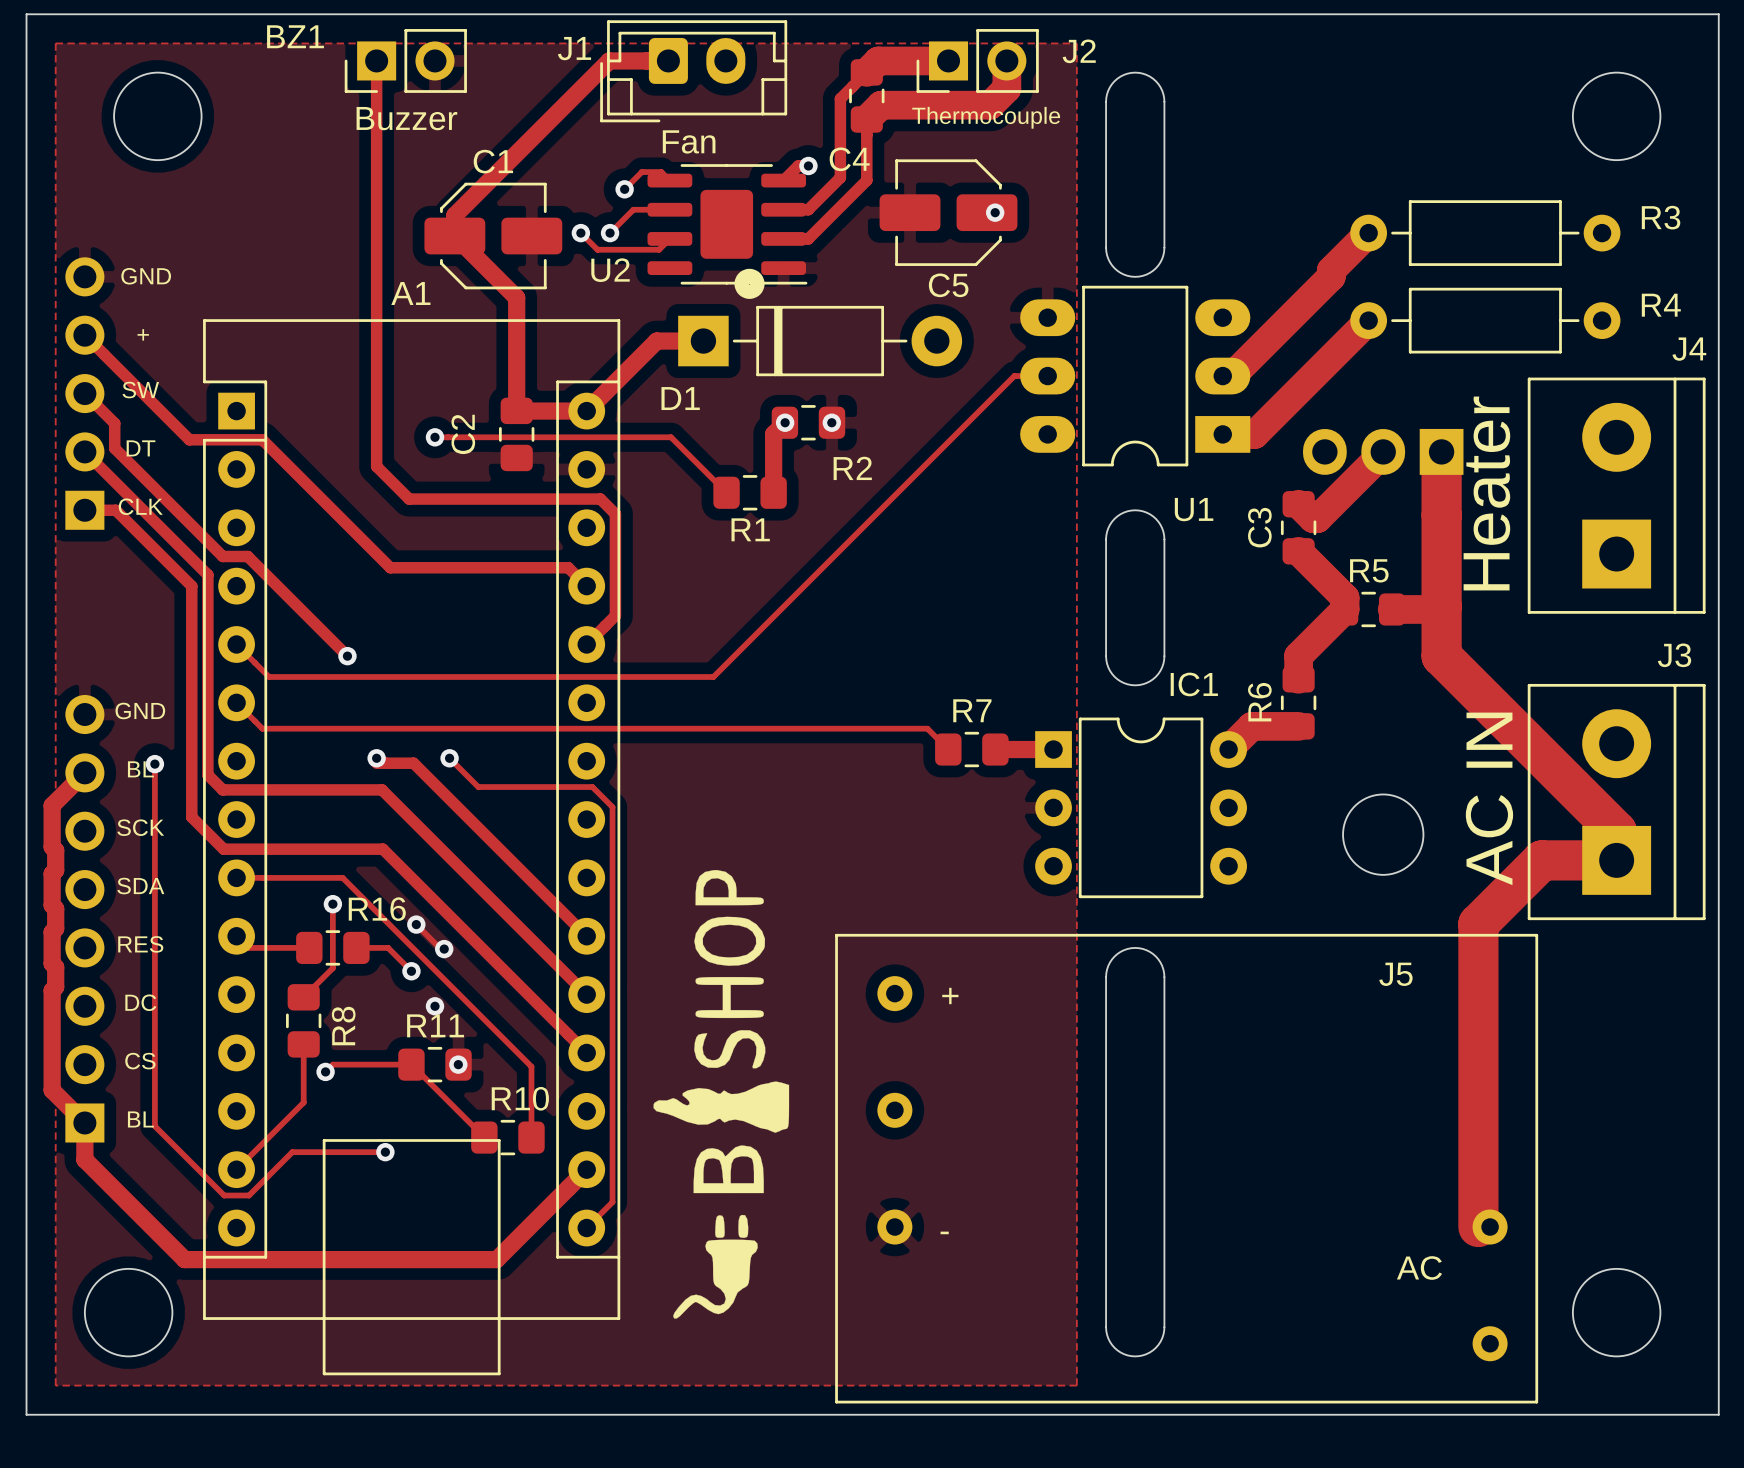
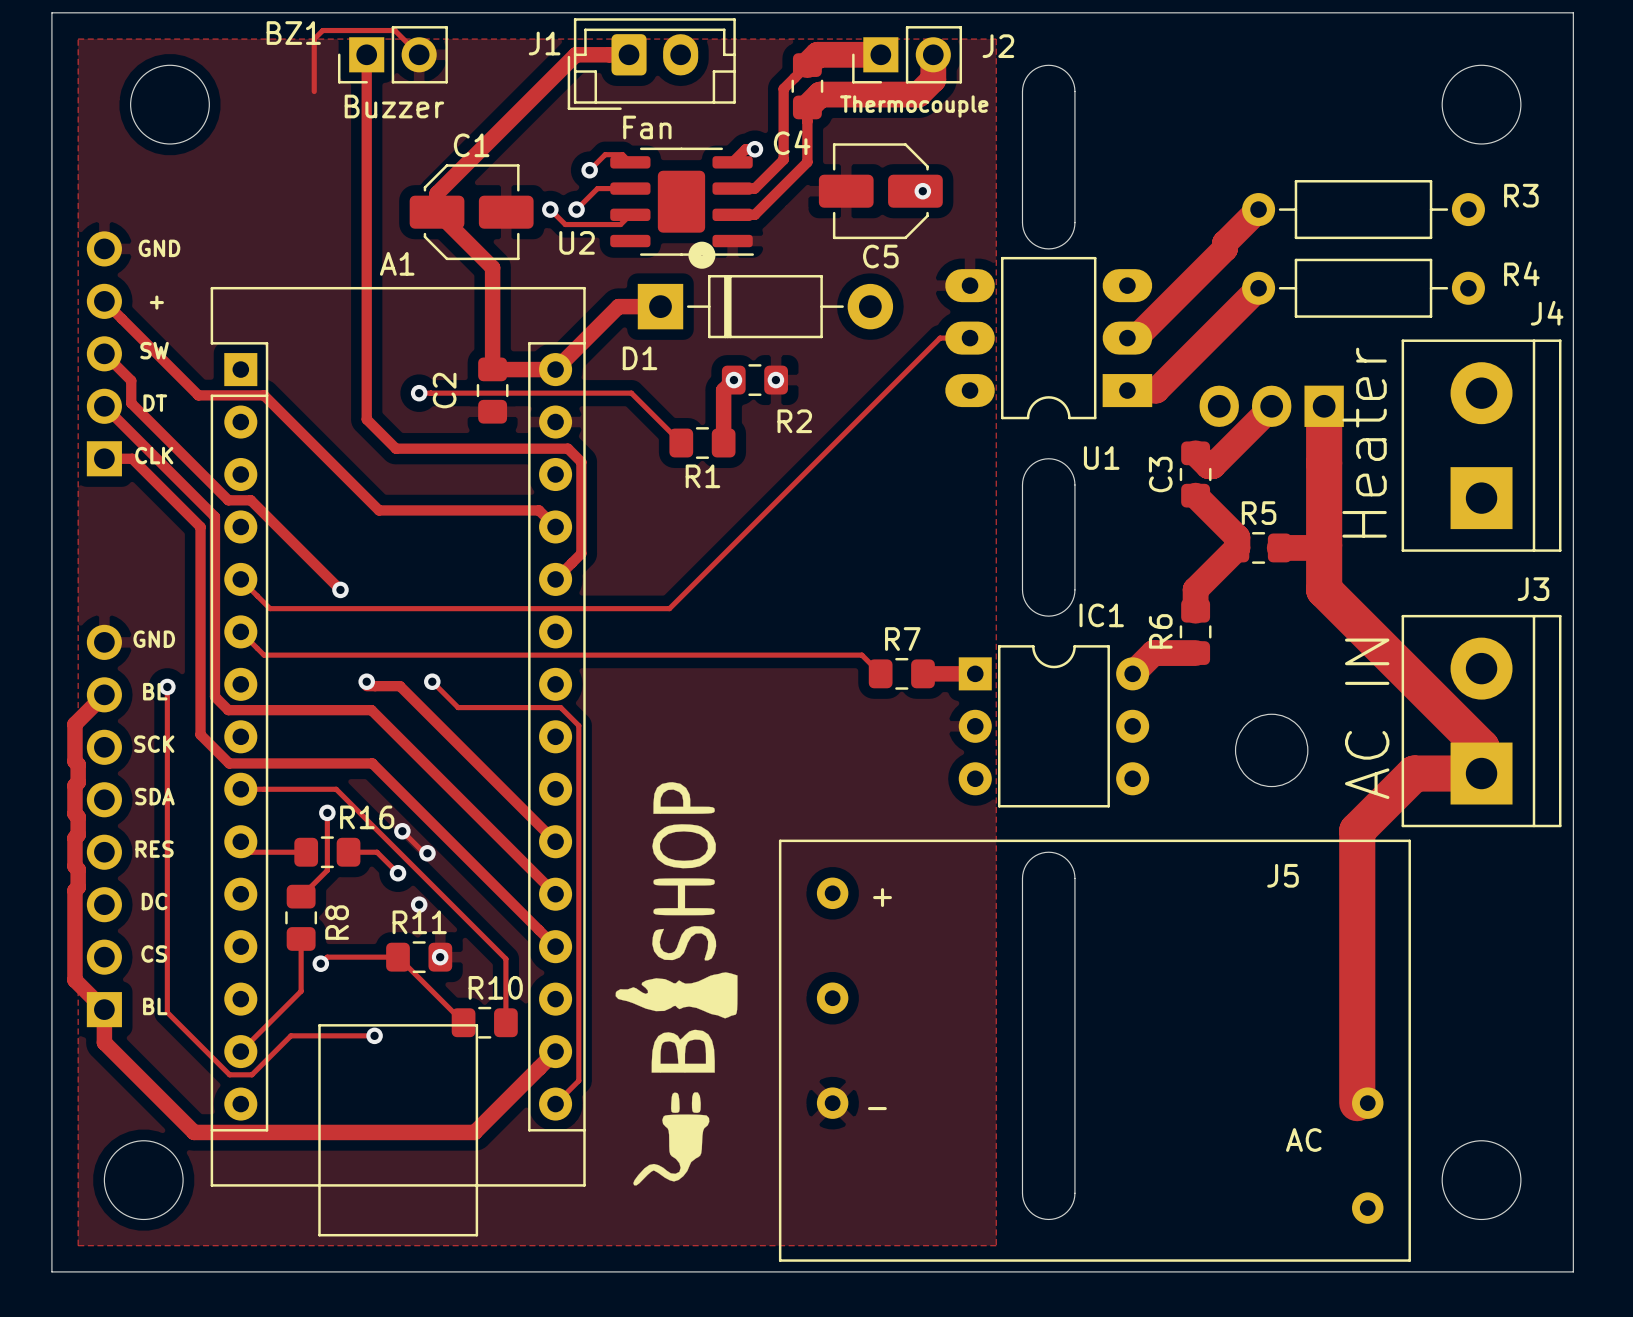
track: none -> (419, 54) (394, 30) (322, 30) (314, 39) (314, 91)

